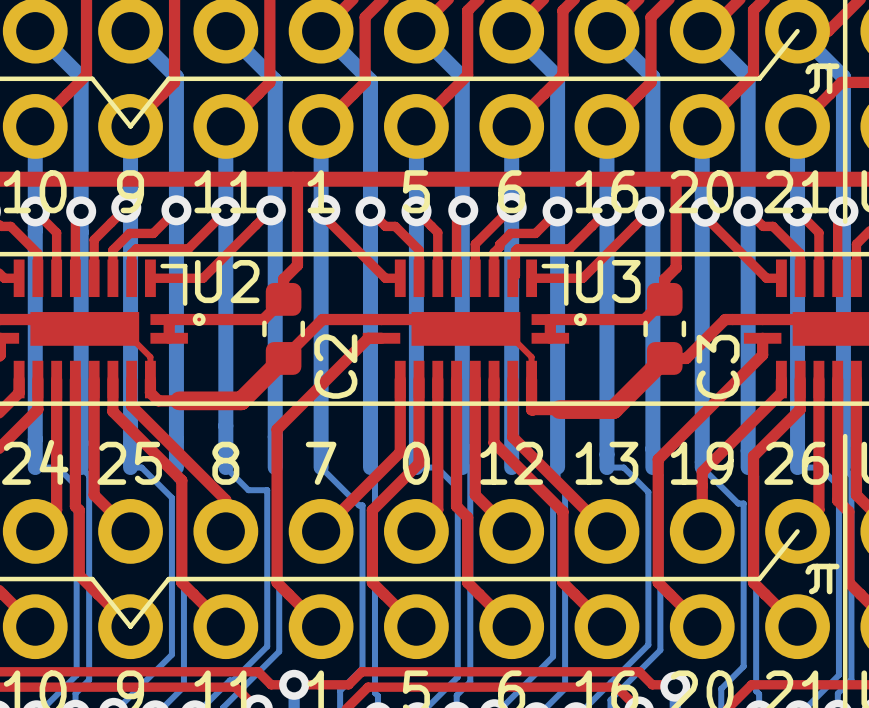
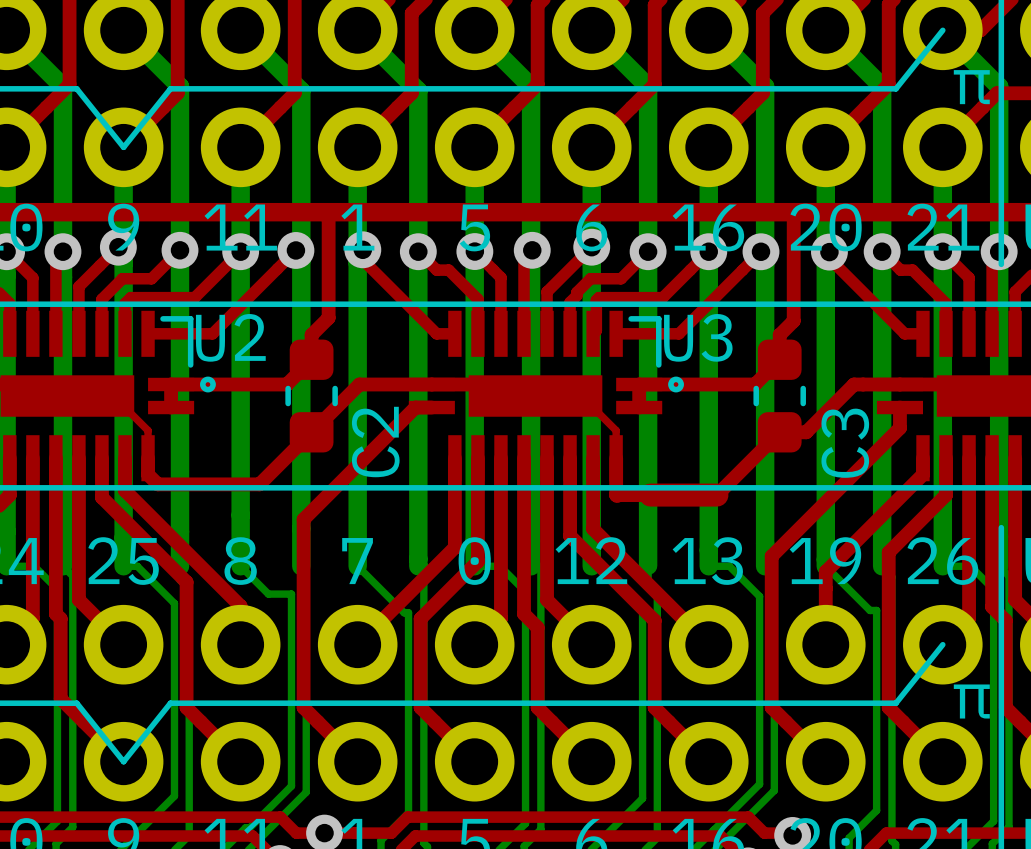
top track width: thick (283, 358) (241, 400) (179, 400) -> thin (311, 432) (259, 484) (183, 484)
top track width: thick (664, 358) (613, 409) -> thin (779, 432) (716, 495)

